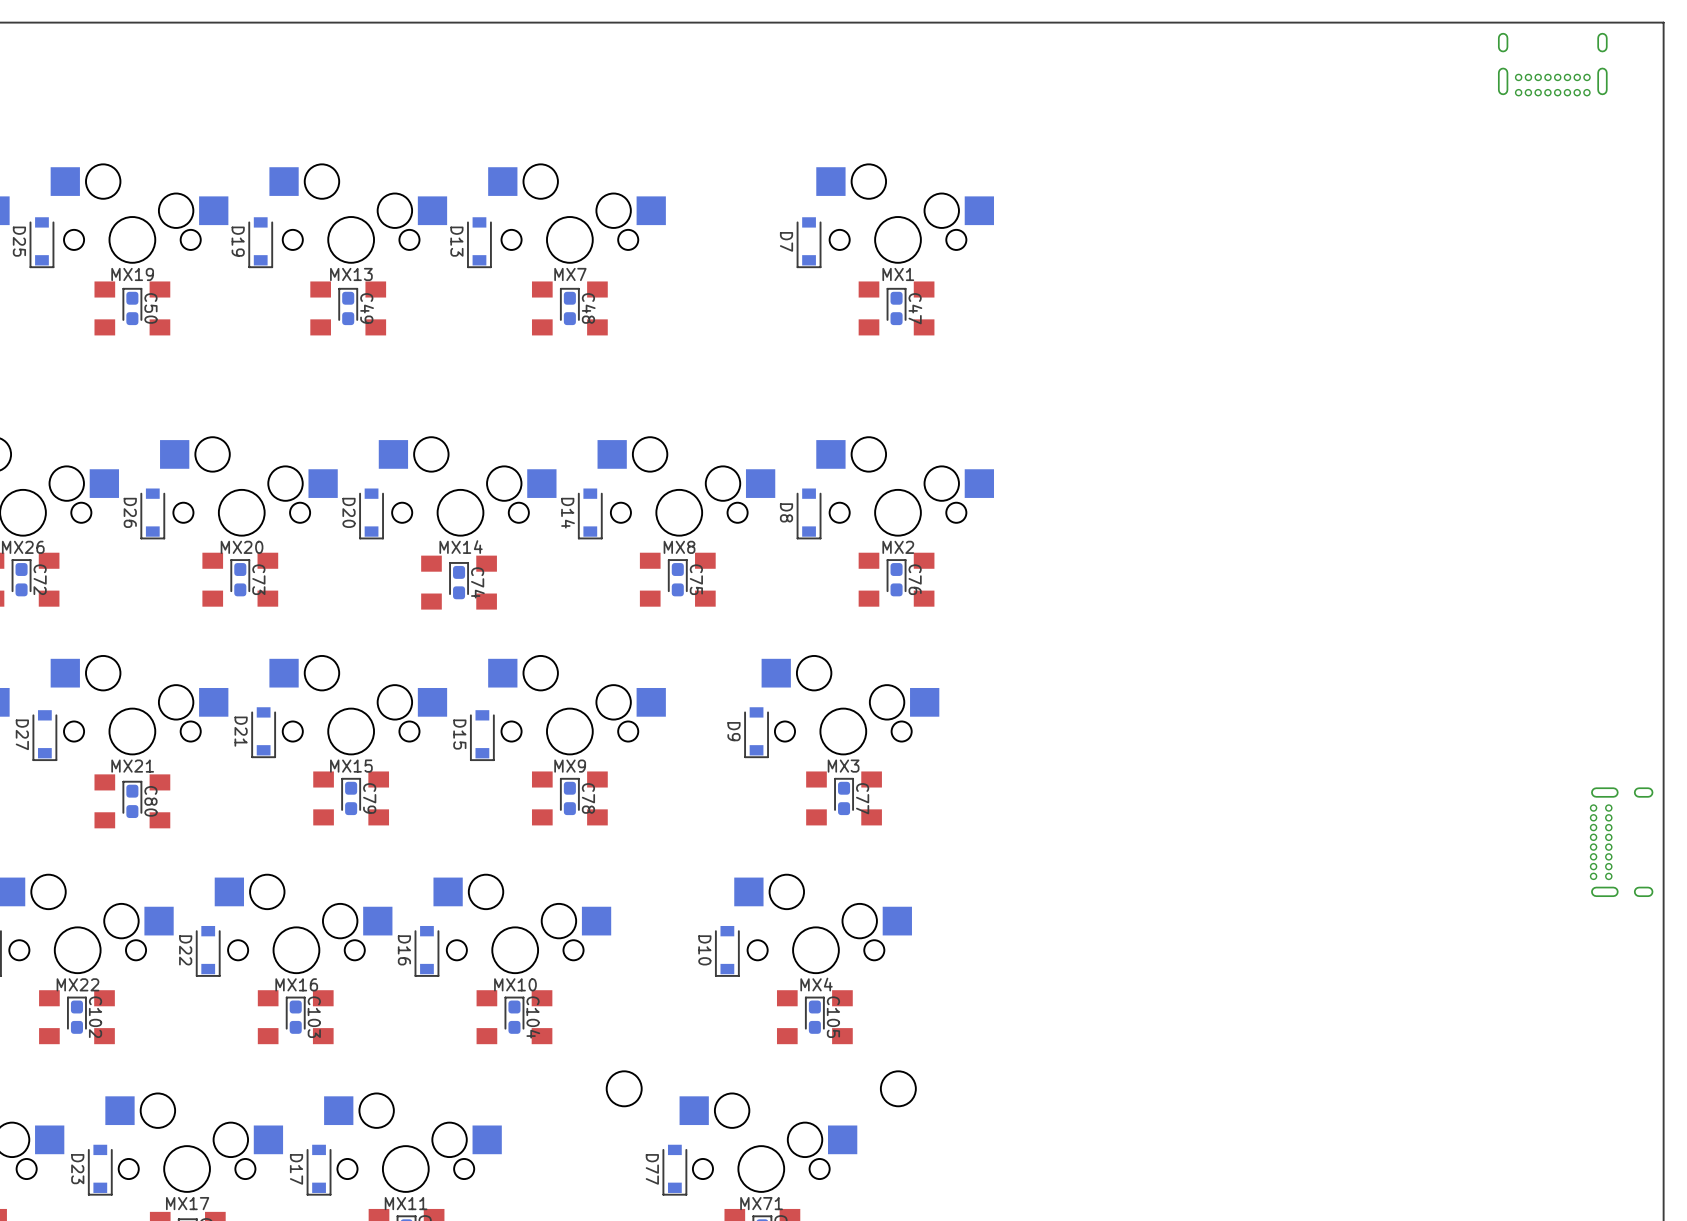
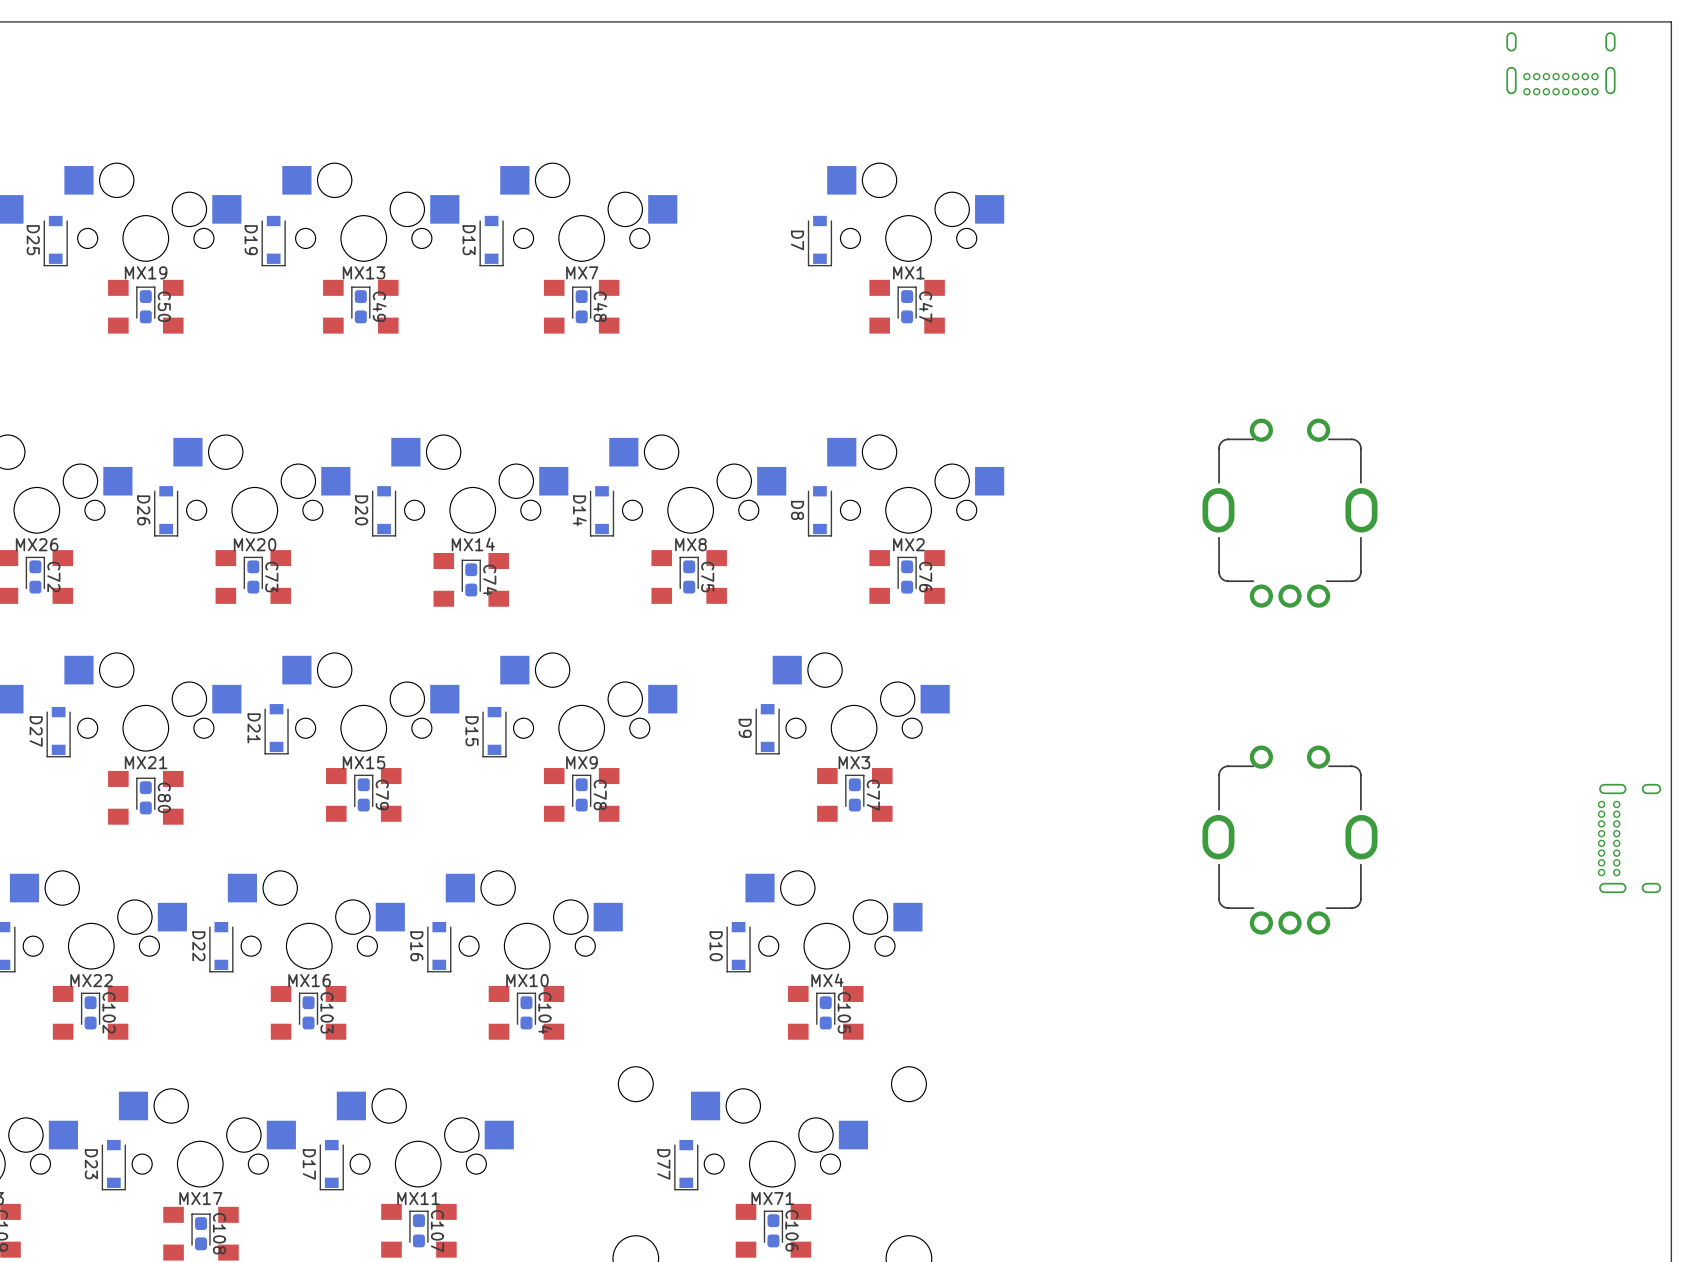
part: none -> (1289, 513)
part: none -> (1289, 840)

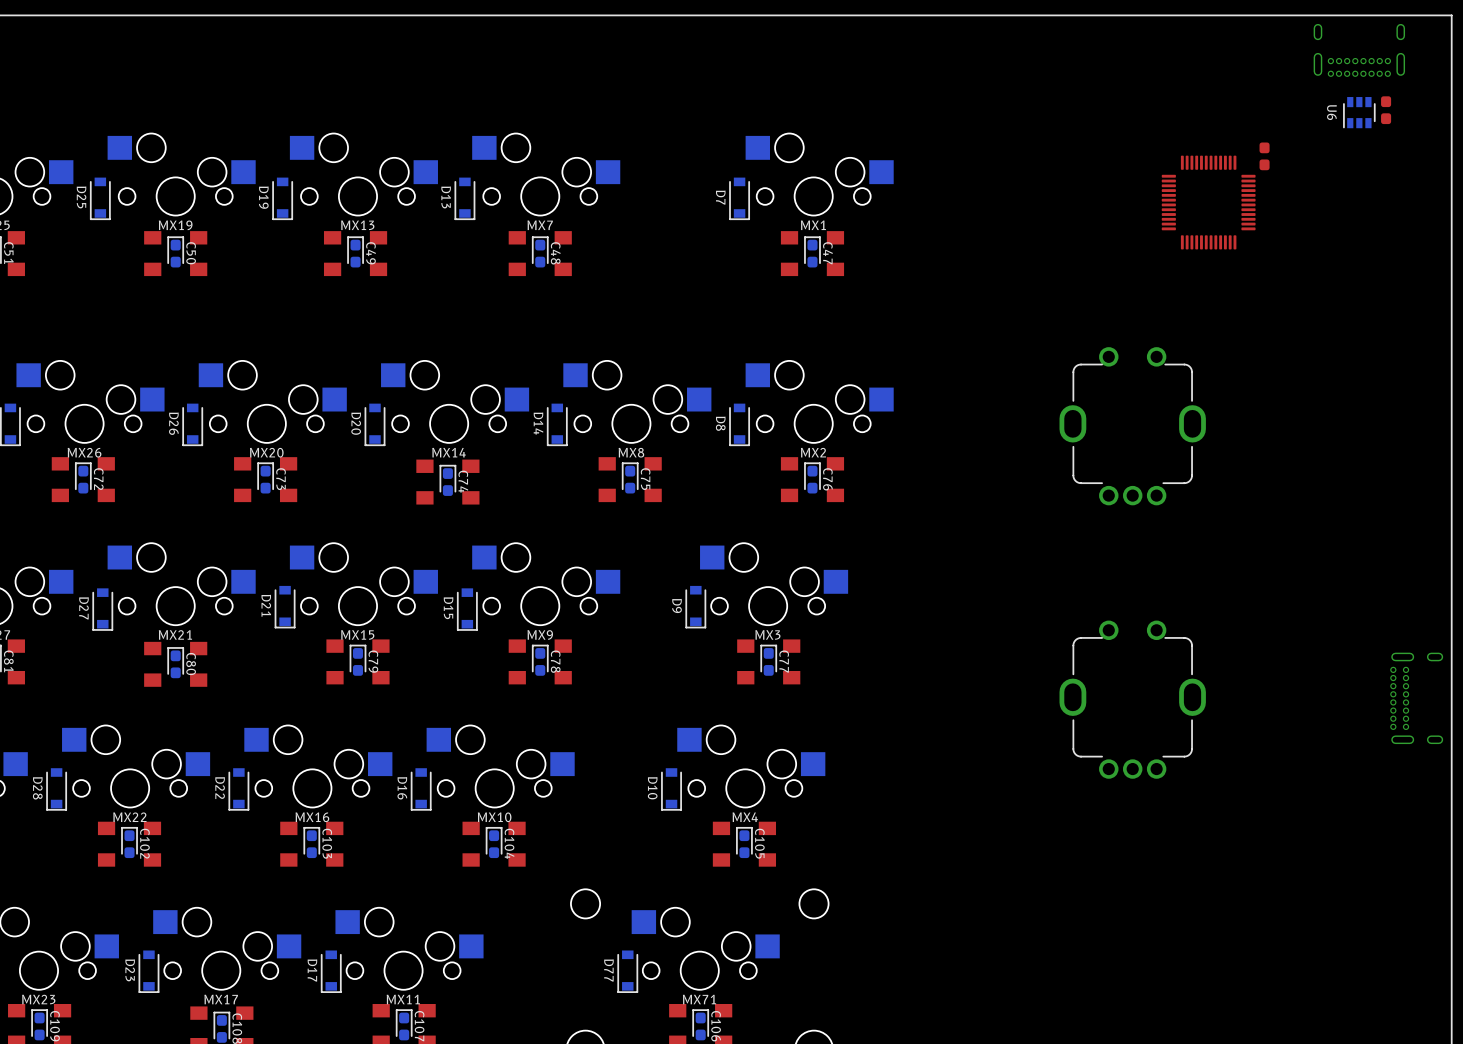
part: none -> (1386, 110)
U6: none -> (1359, 112)
part: none -> (1264, 156)
part: none -> (1208, 202)

